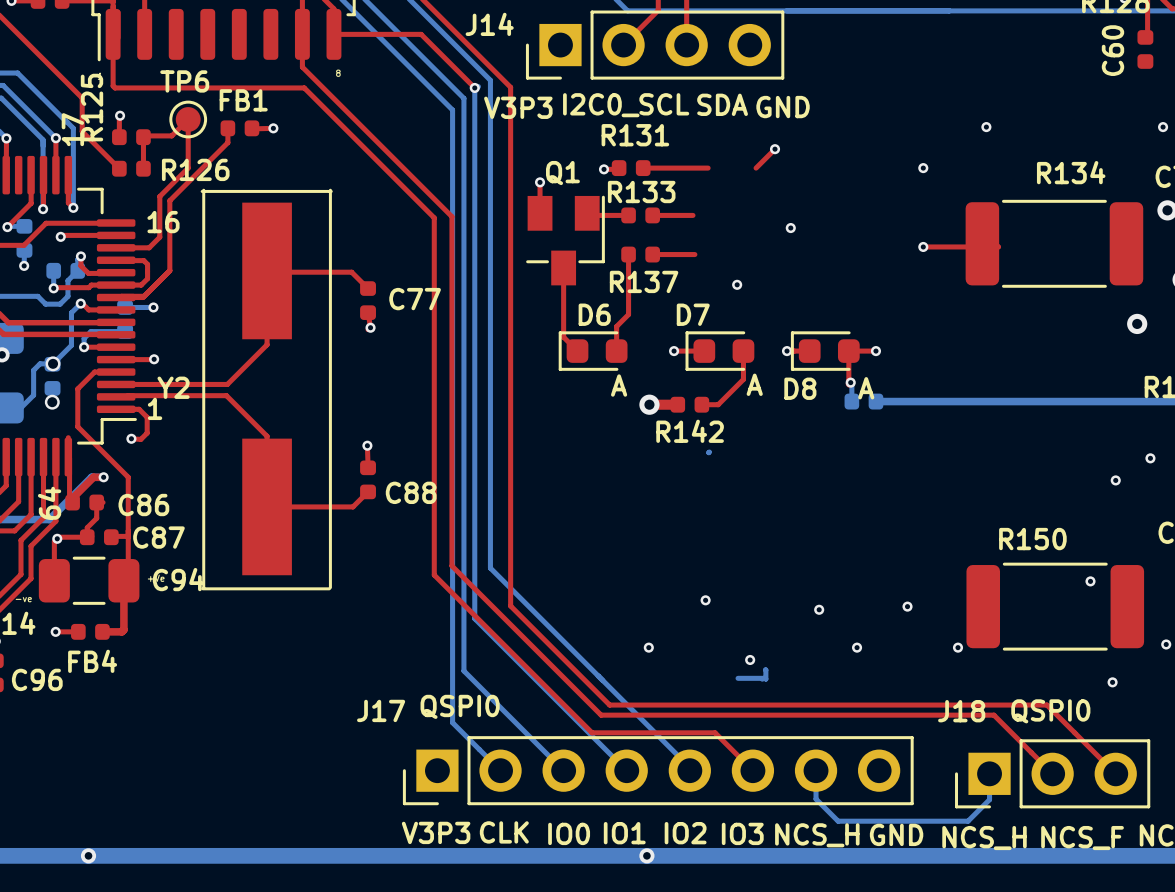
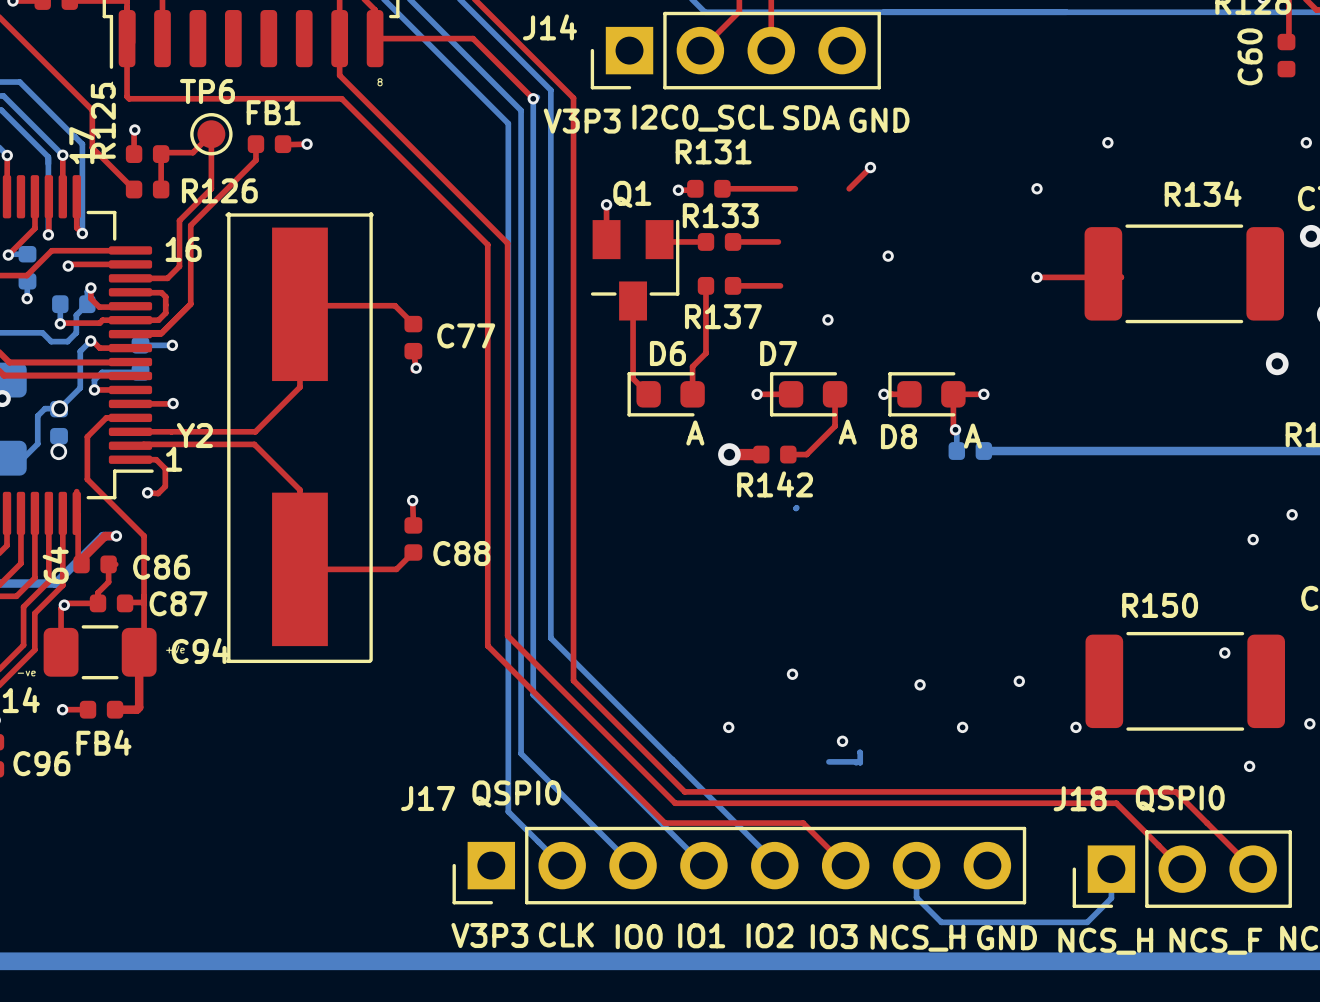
via: (88, 855) -> none
via: (646, 855) -> none

